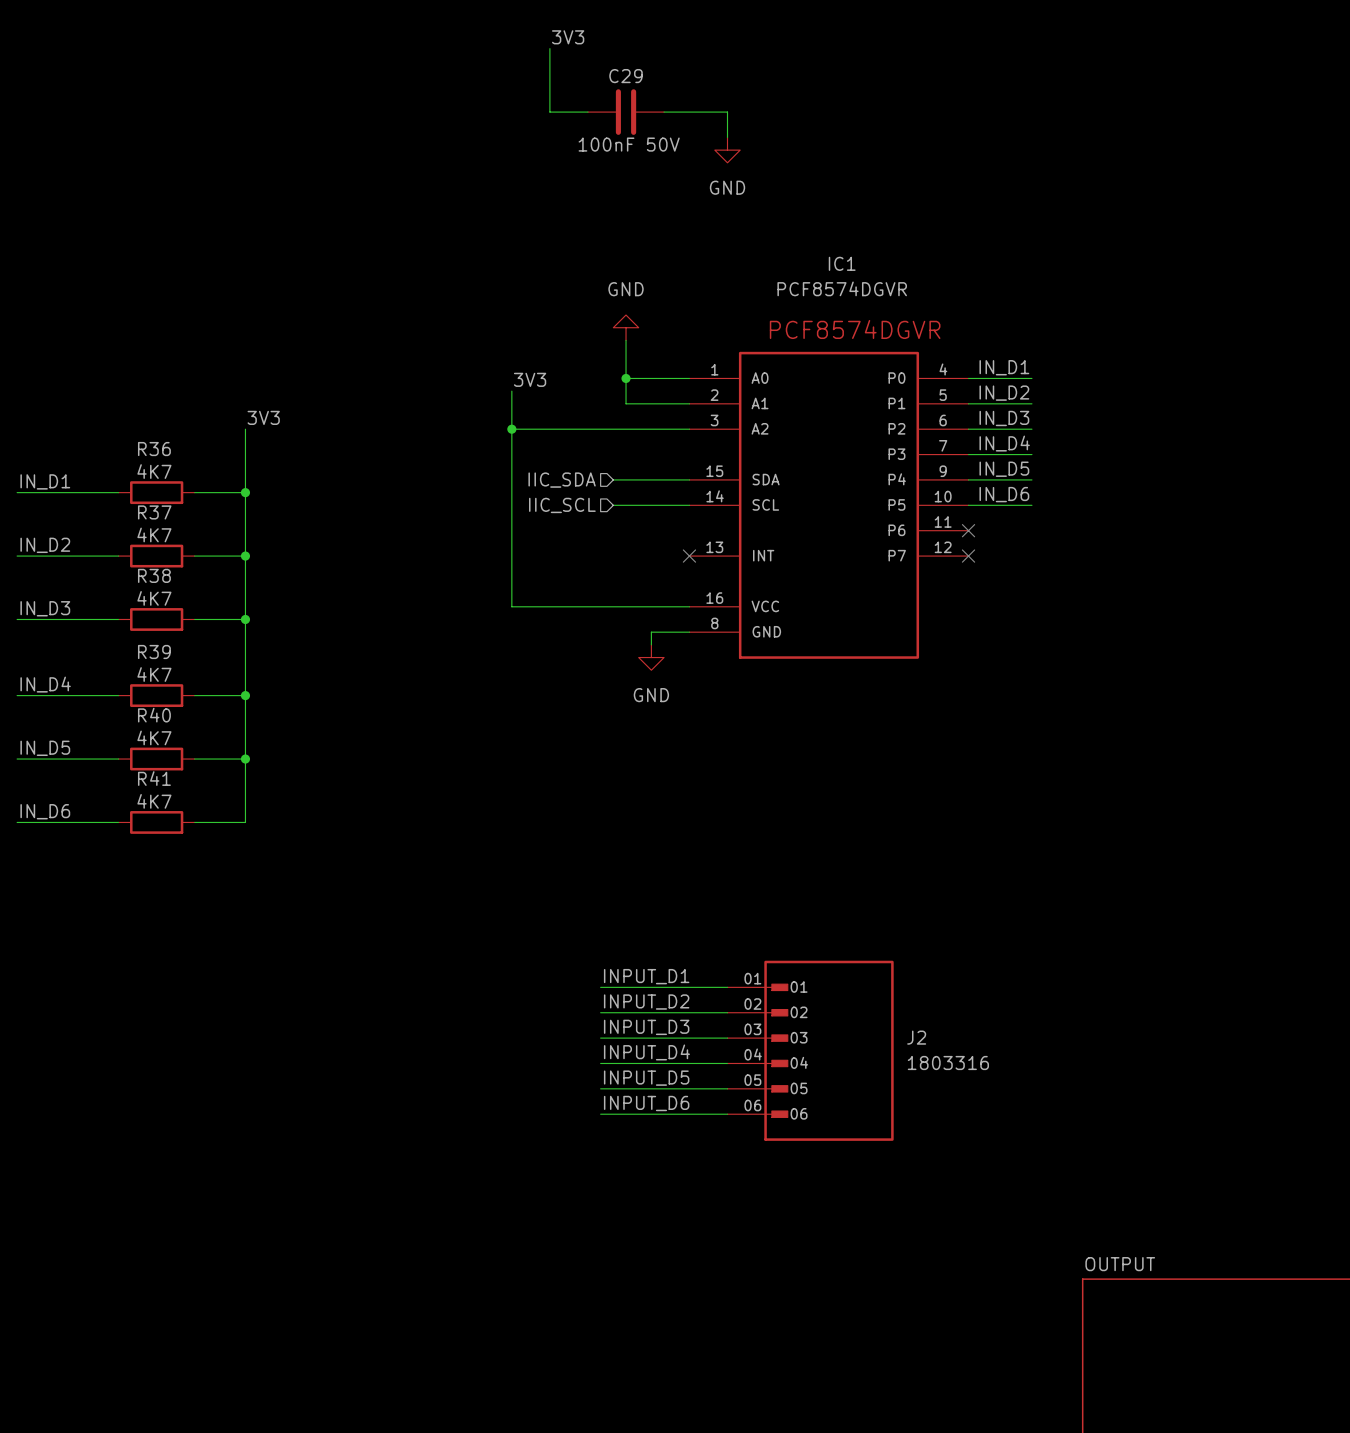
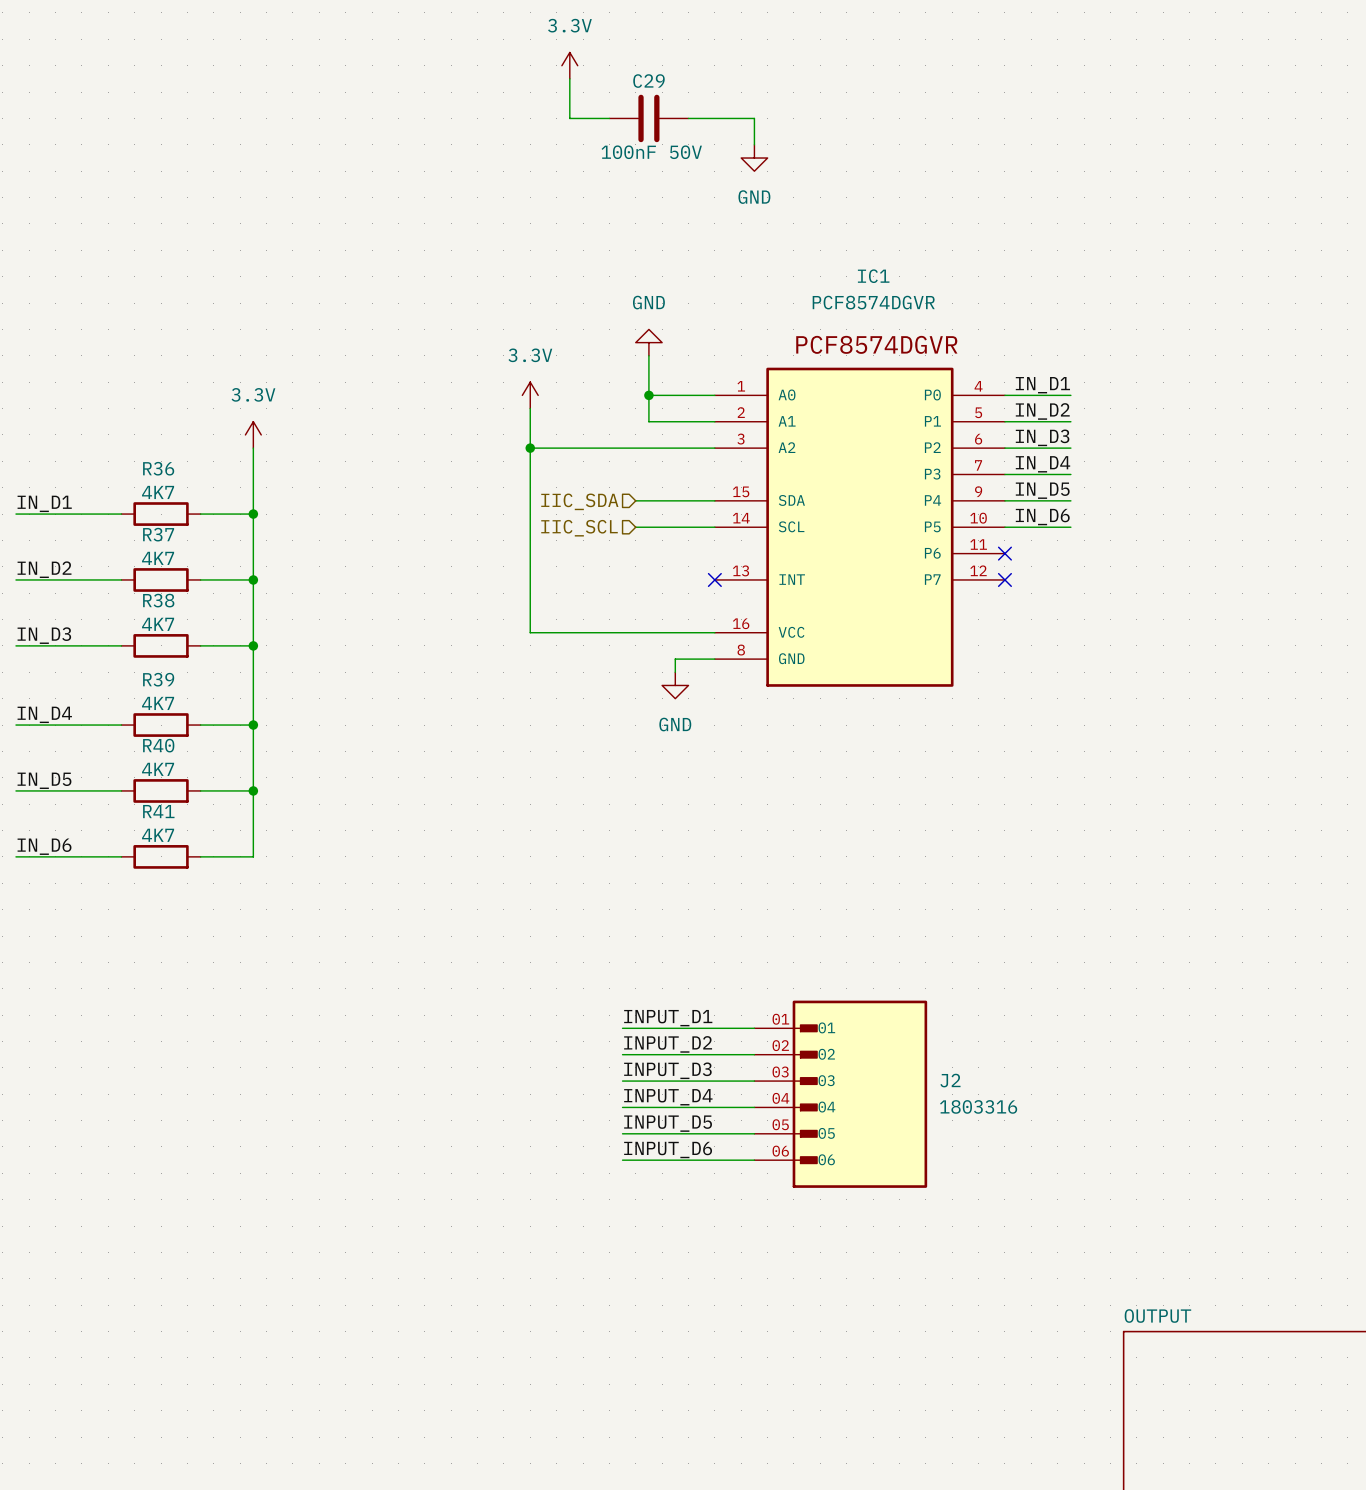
label: 3V3 (568, 37) -> none
power symbol: none -> 3.3V (569, 65)
power symbol: none -> 3.3V (530, 395)
label: 3V3 (530, 379) -> none
power symbol: none -> 3.3V (253, 434)
label: 3V3 (263, 417) -> none

